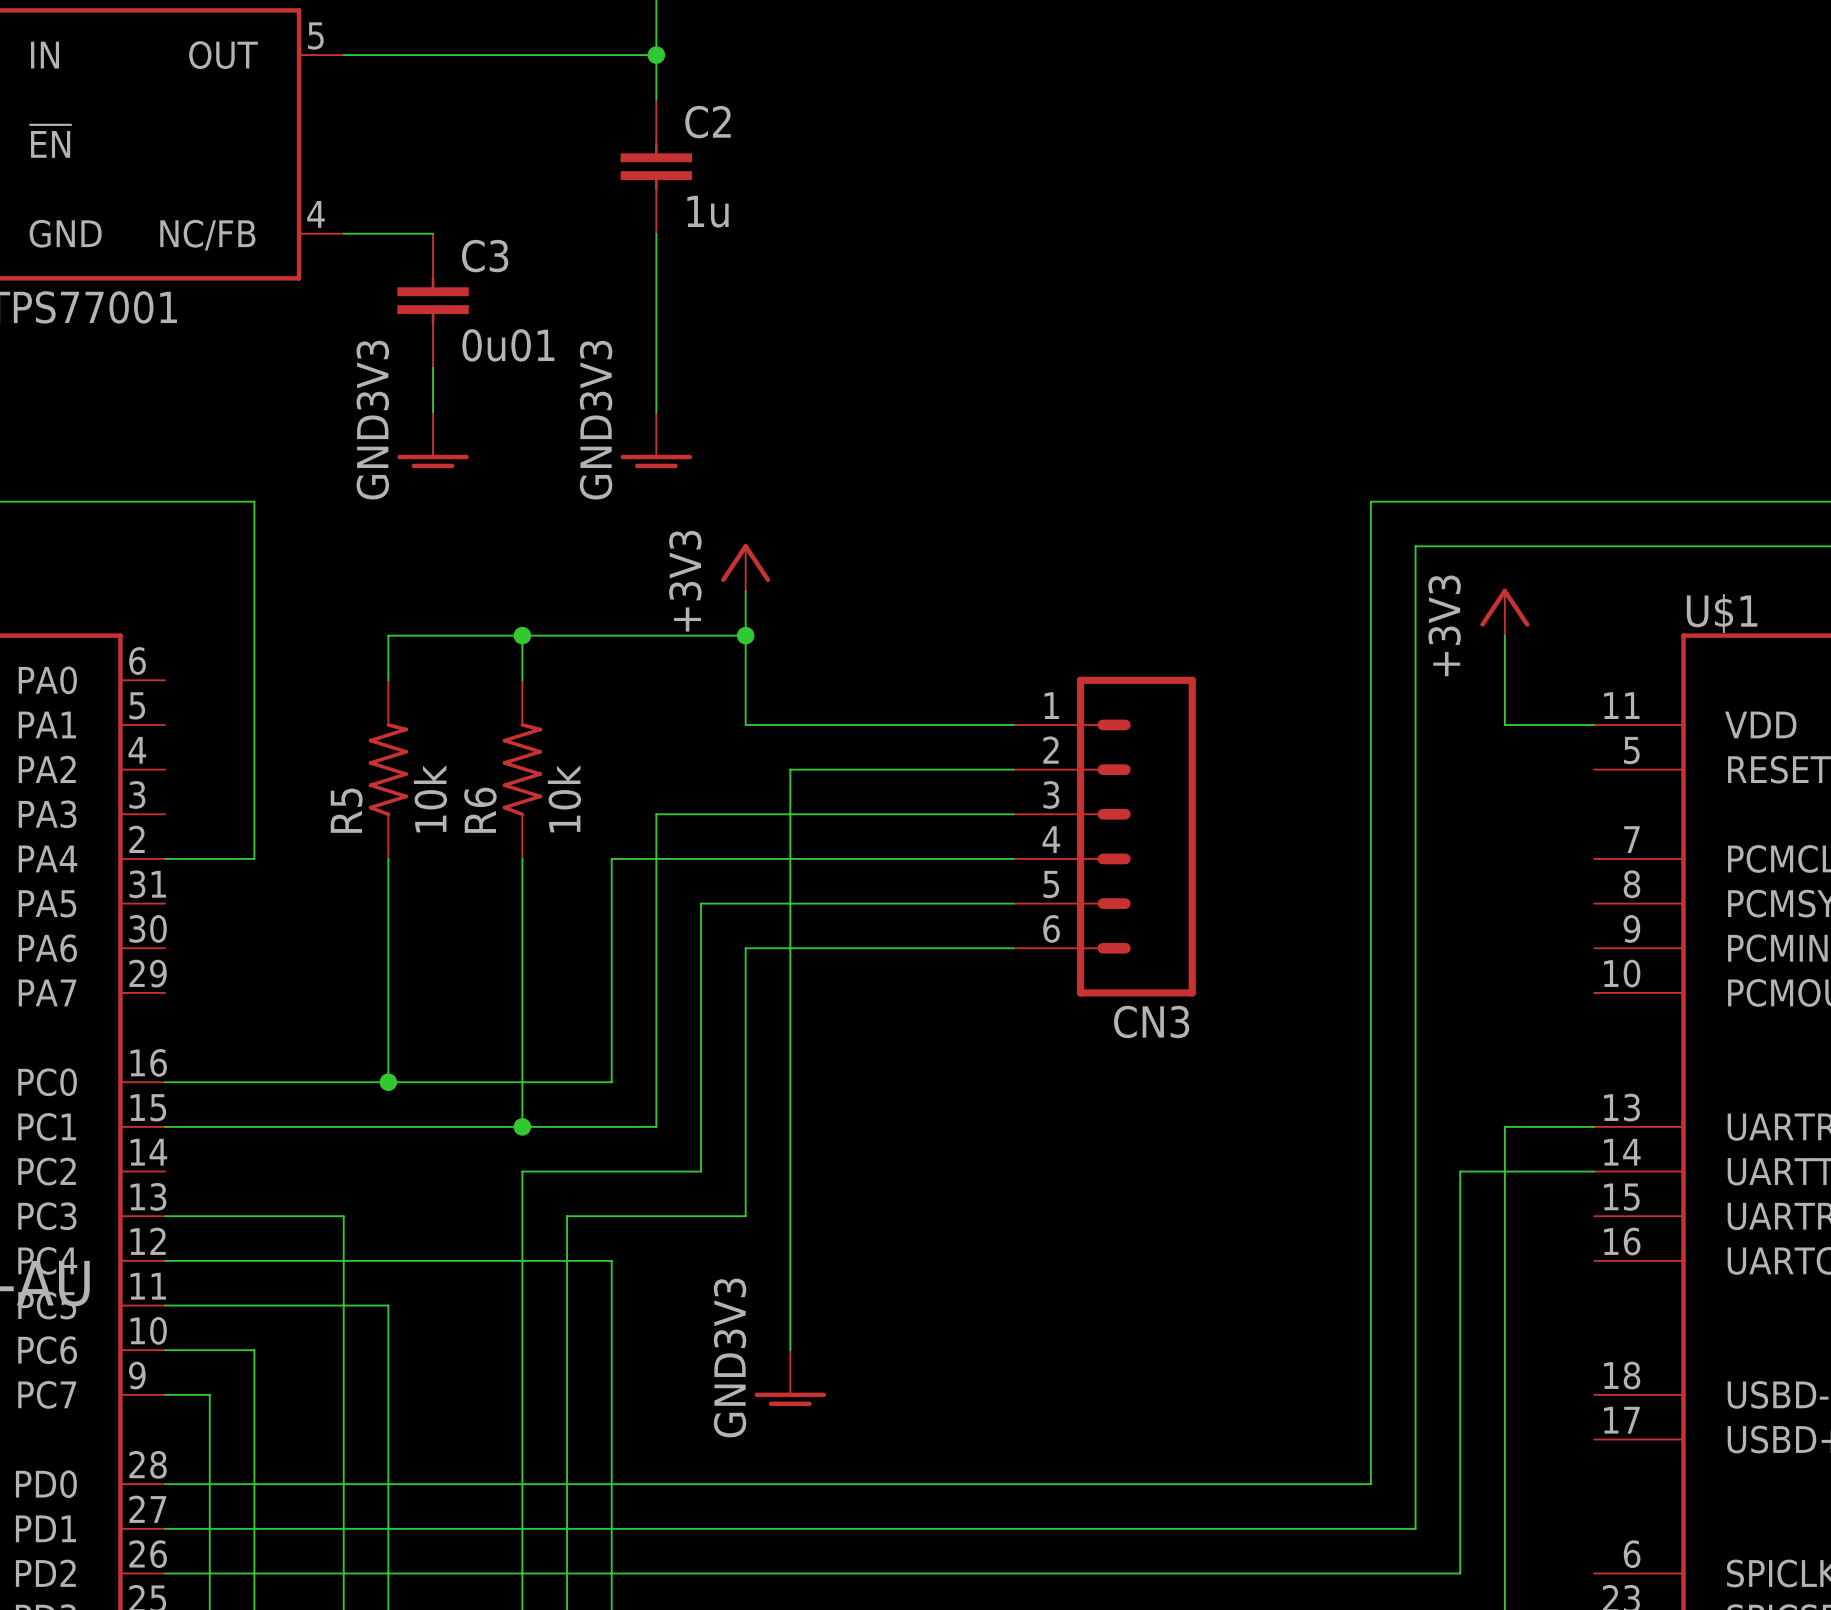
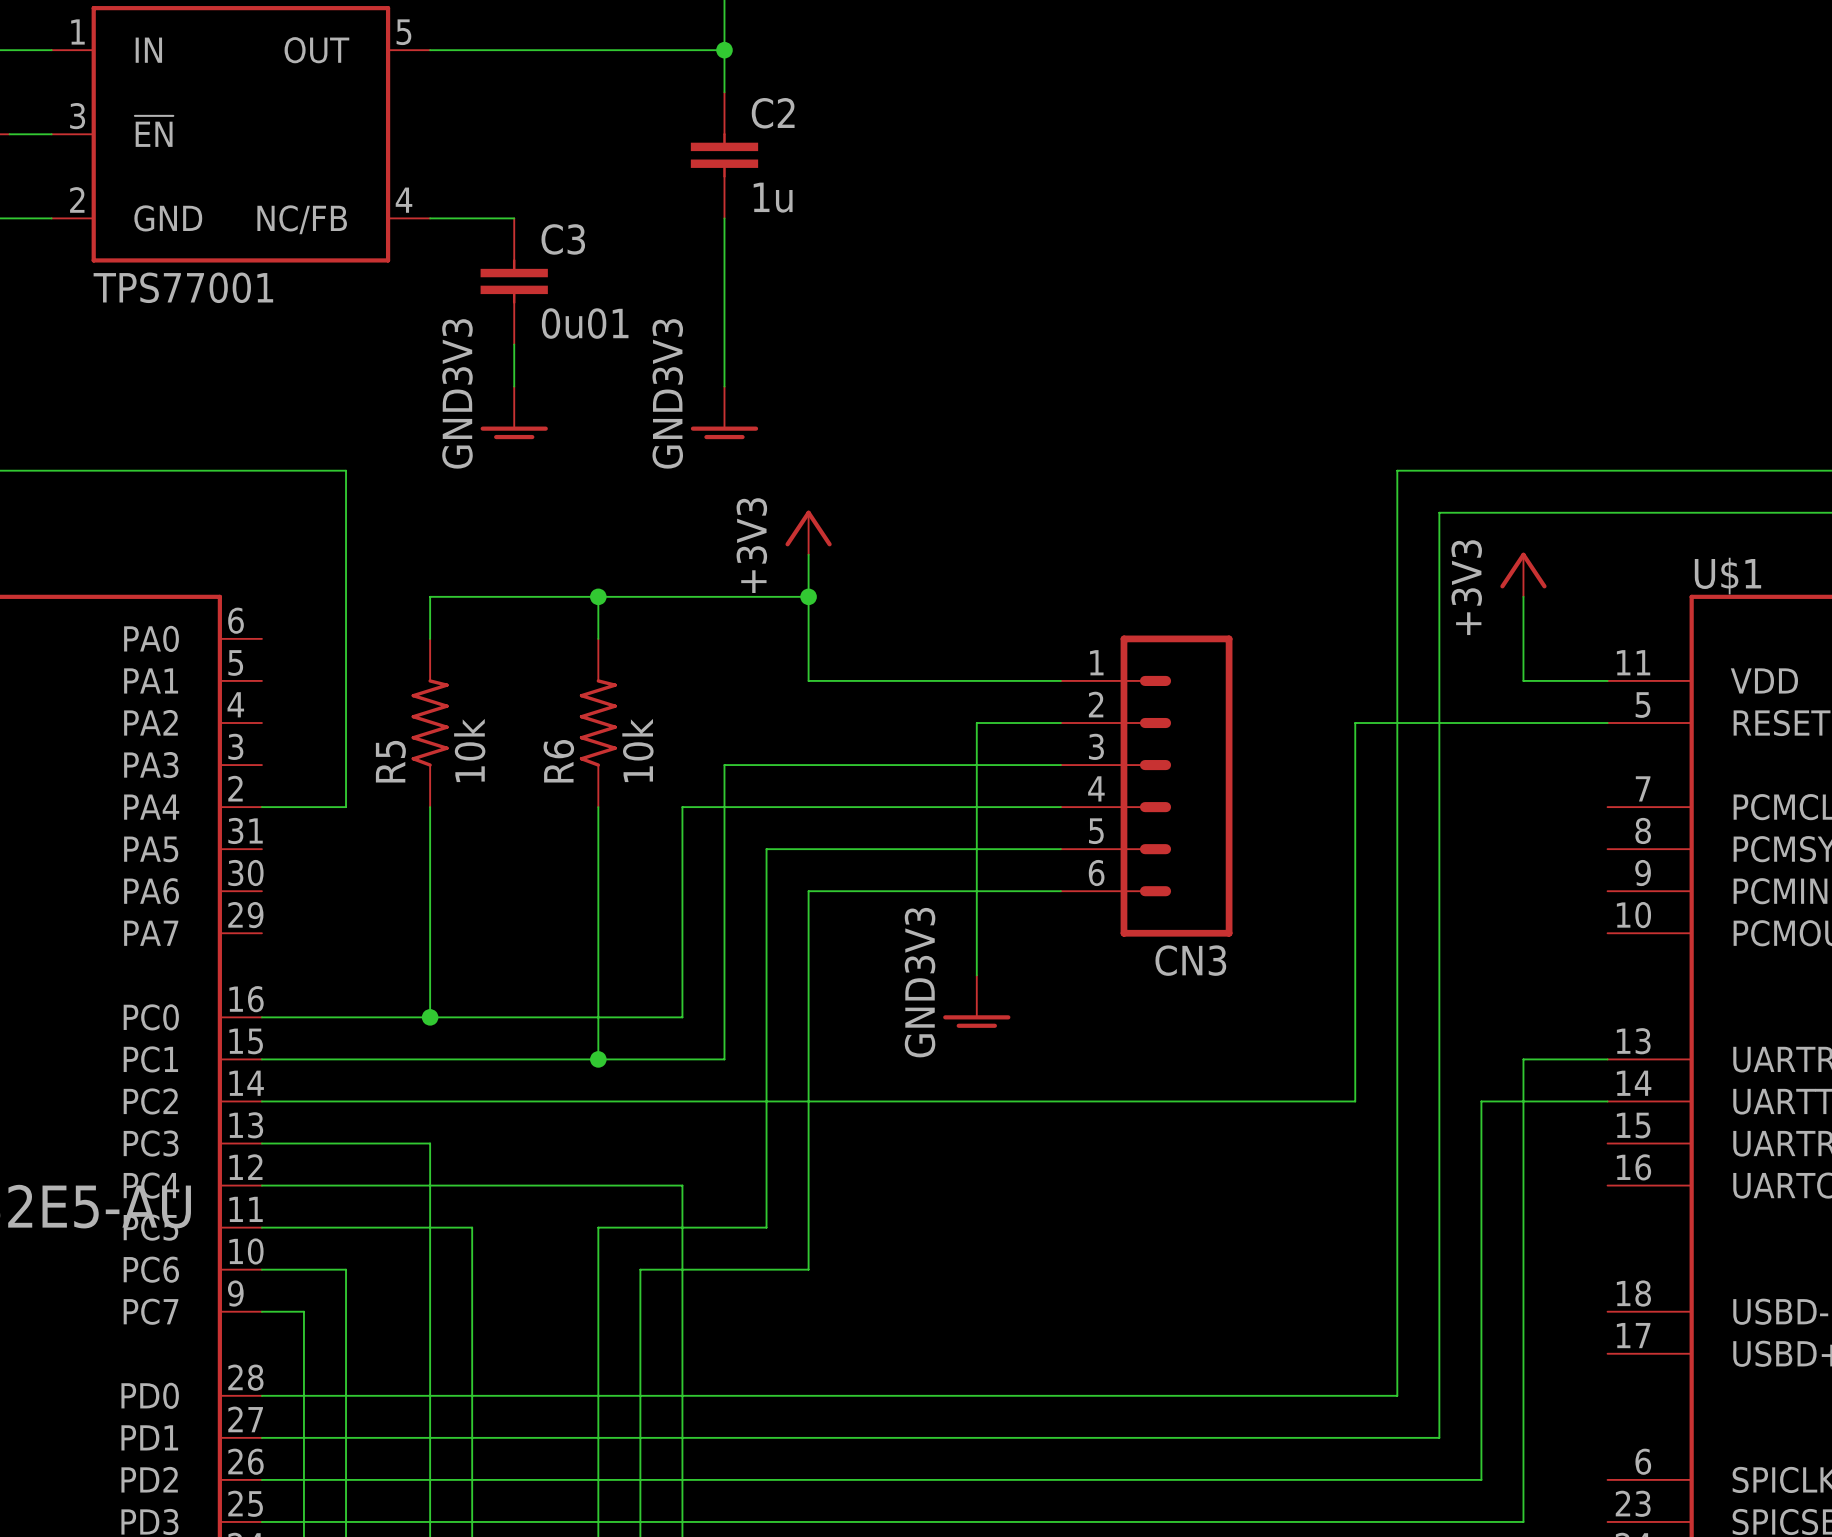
wire: (388, 635) (388, 680) -> (472, 596) (430, 596) (430, 638)
R5 position: (388, 769) -> (430, 723)
wire: (924, 769) (790, 769) (790, 1350) -> (976, 723) (976, 975)
wire: none -> (1607, 723) (1355, 723) (1355, 1101) (766, 1101) (766, 1227) (598, 1227)
wire: (388, 858) (388, 1082) -> (430, 807) (430, 1017)
junction position: (388, 1082) -> (430, 1017)
wire: (522, 1171) (522, 1305) -> (598, 1101) (261, 1101)
wire: (745, 1216) (567, 1216) (567, 1350) -> (808, 1143) (808, 1269) (640, 1269)
power symbol position: GND3V3 (790, 1378) -> GND3V3 (976, 1001)

